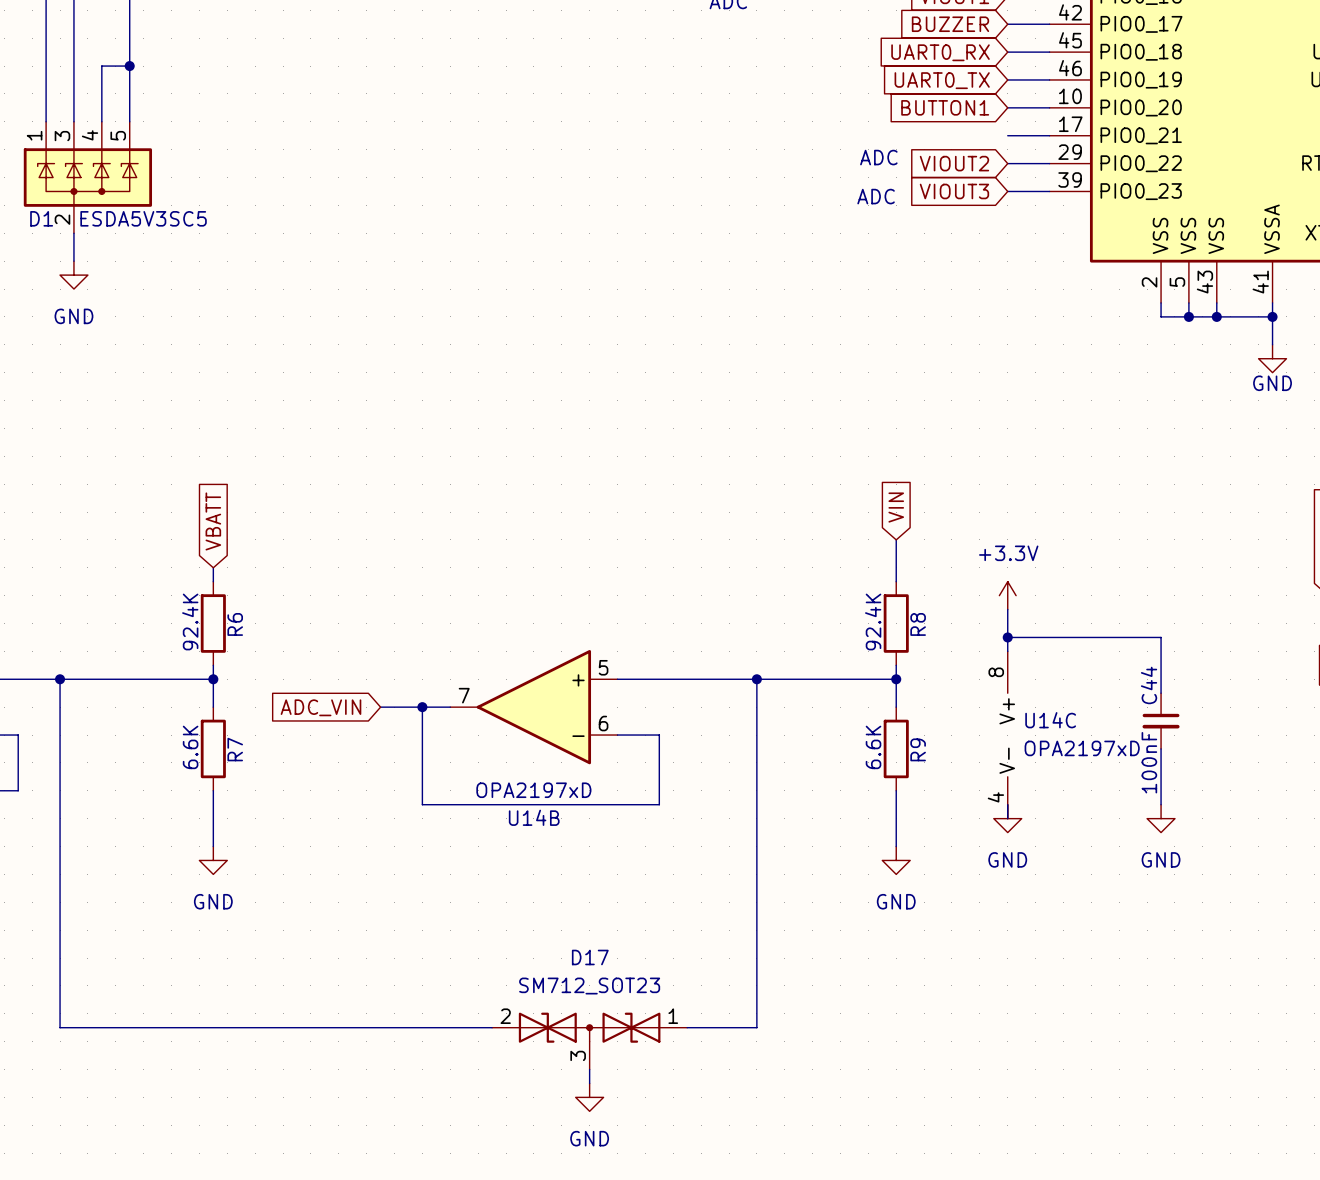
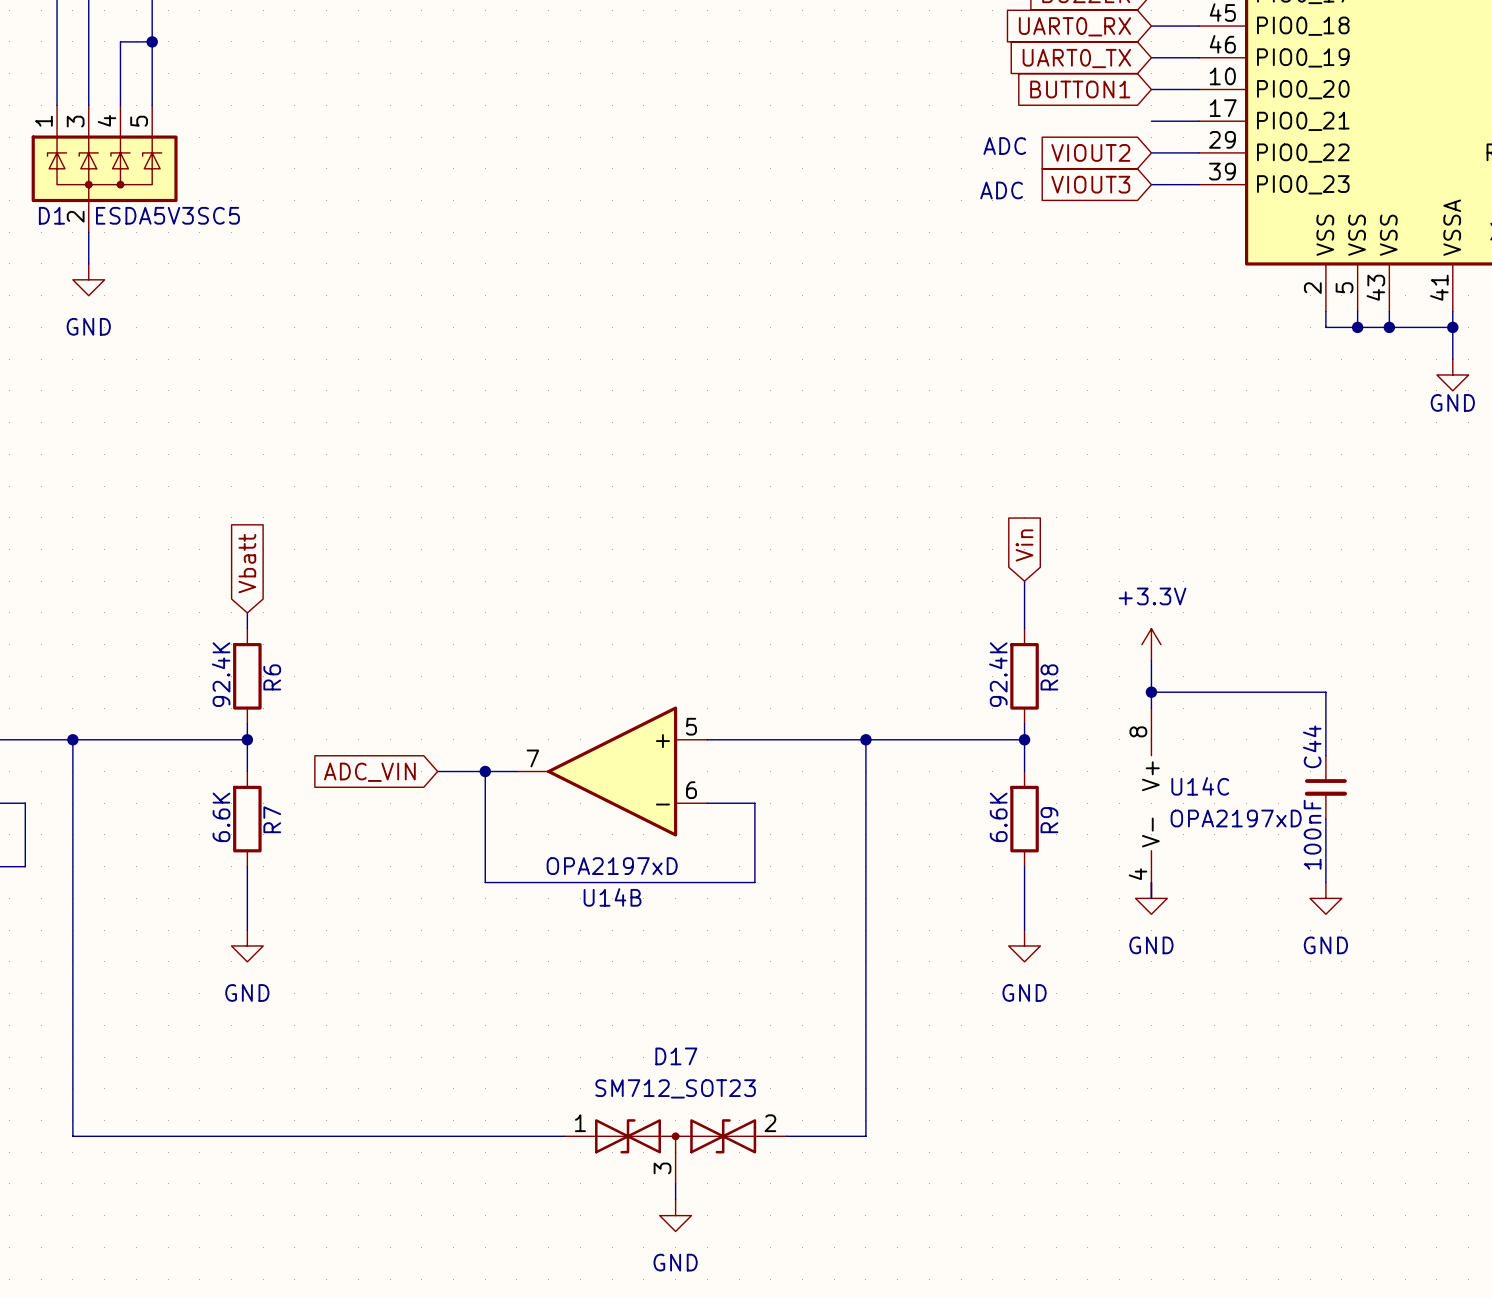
global label: VIN (896, 507) -> Vin (1024, 545)
global label: VBATT (213, 521) -> Vbatt (247, 563)
D17 flip: as is (589, 1027) -> left-right (675, 1136)

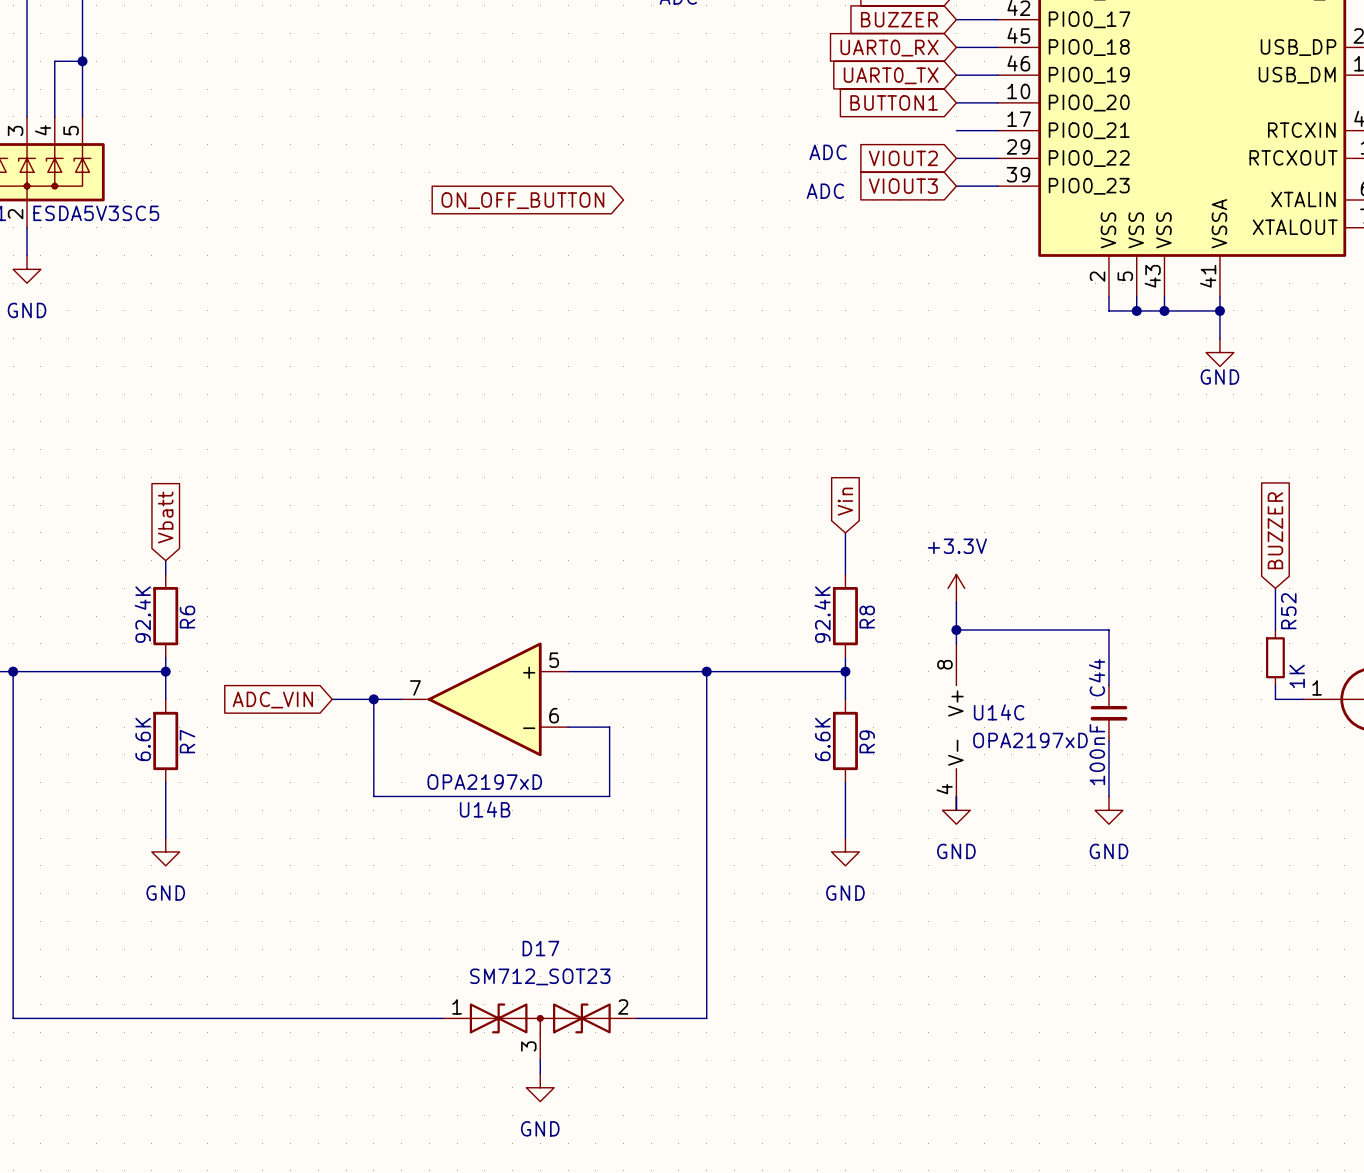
global label: none -> ON_OFF_BUTTON (522, 200)

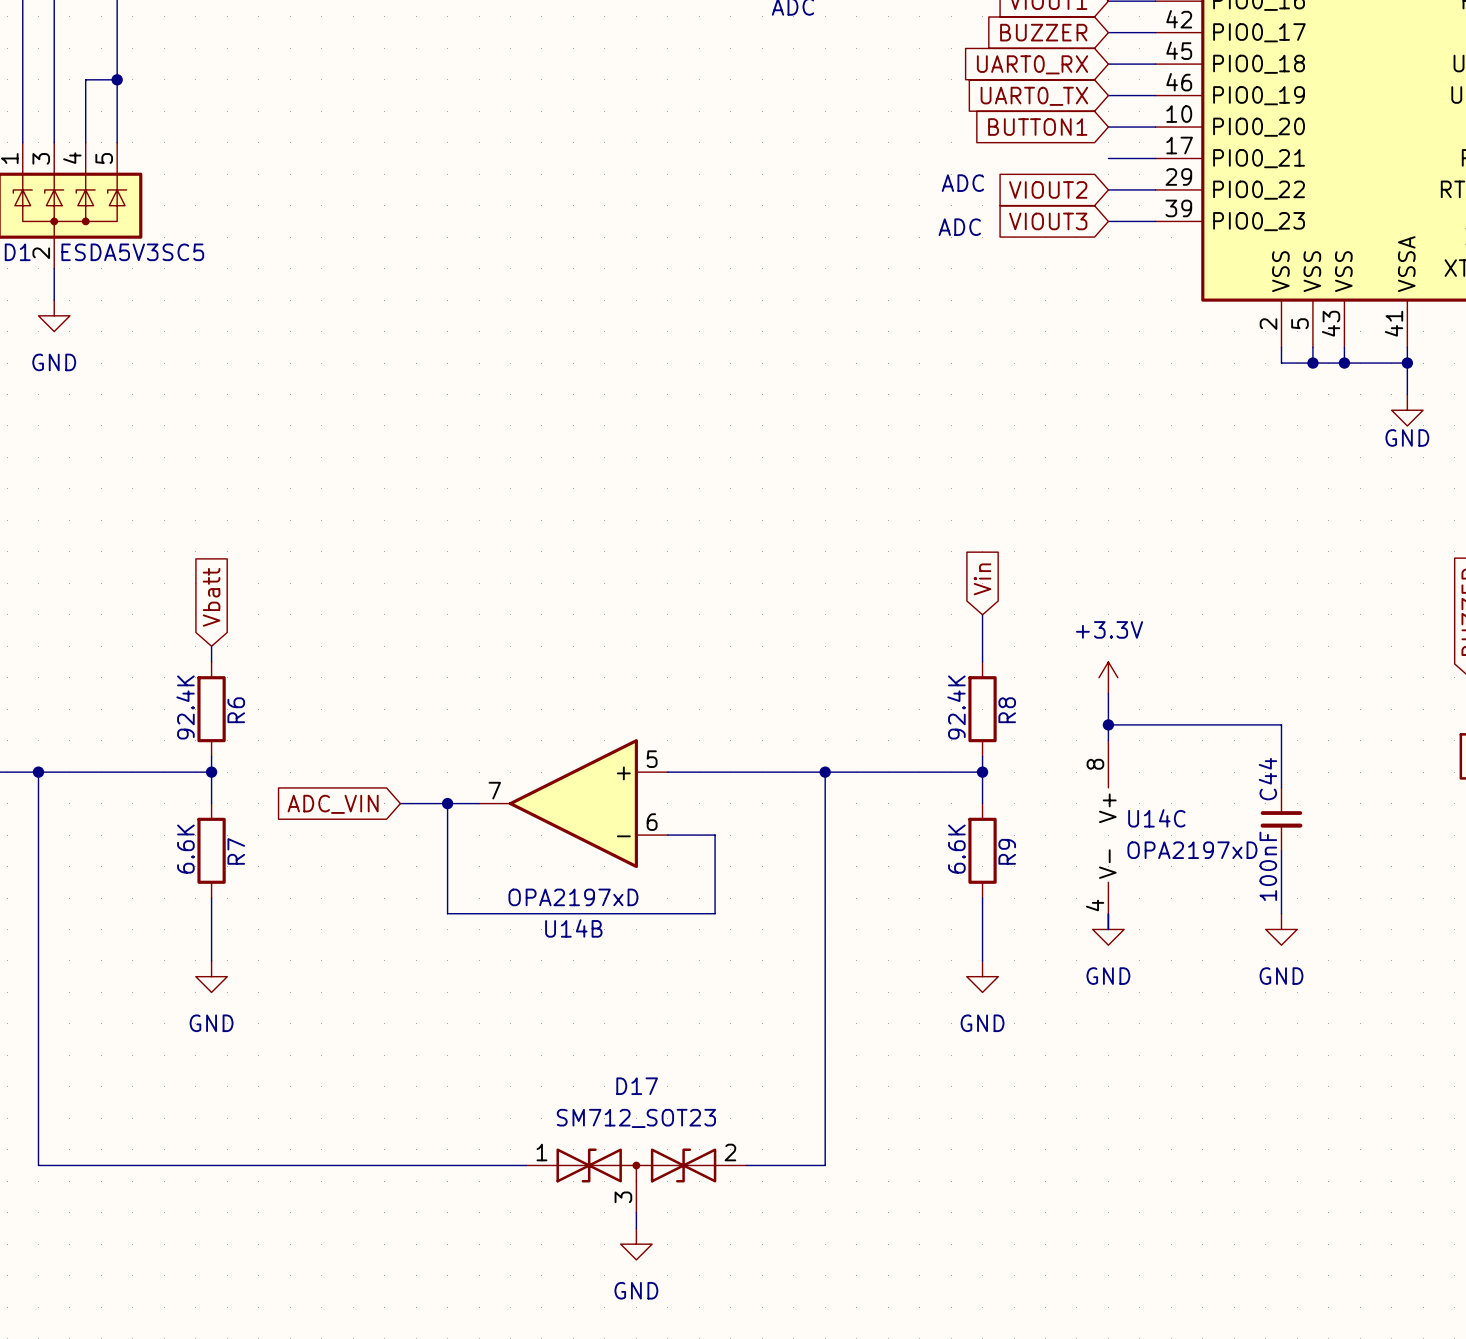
global label: ON_OFF_BUTTON (522, 200) -> none

